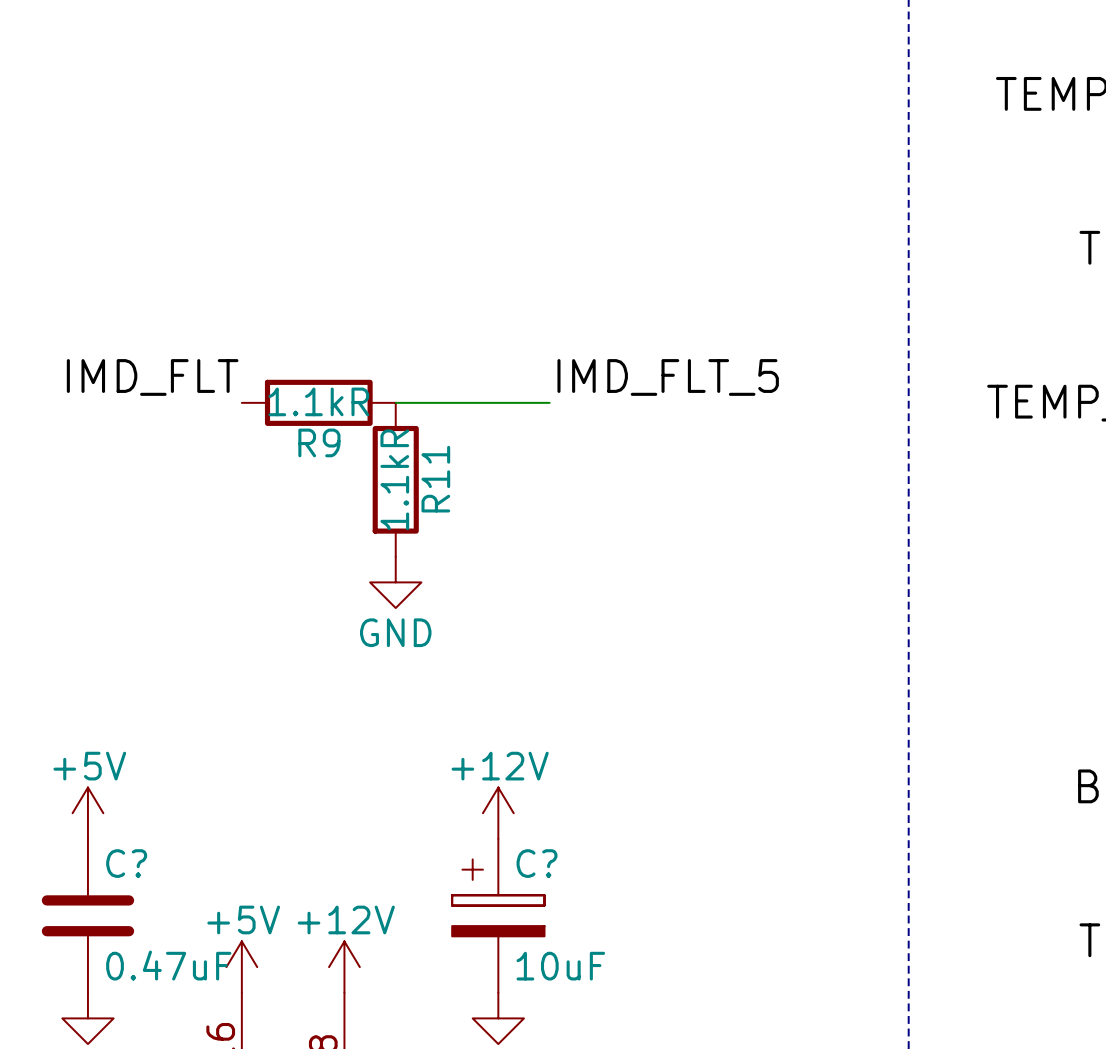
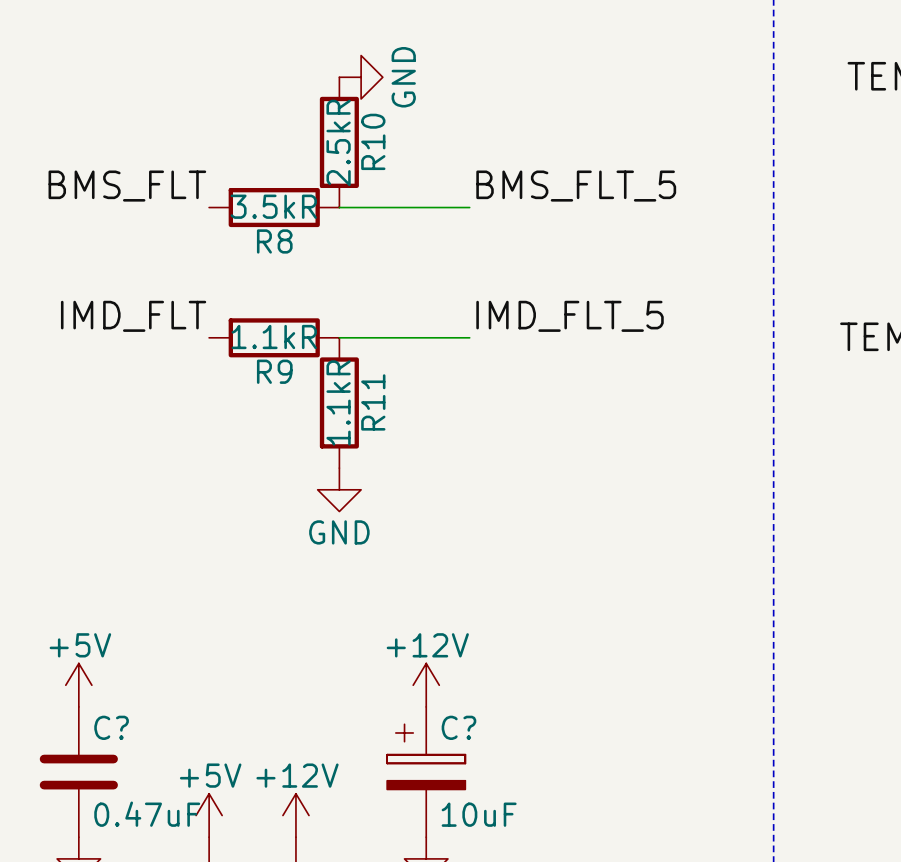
power symbol: none -> GND (361, 77)
R10: none -> 2.5kR (339, 142)
label: none -> BMS_FLT (127, 186)
label: none -> BMS_FLT_5 (576, 186)
R8: none -> 3.5kR (274, 207)
wire: none -> (339, 207) (469, 207)

